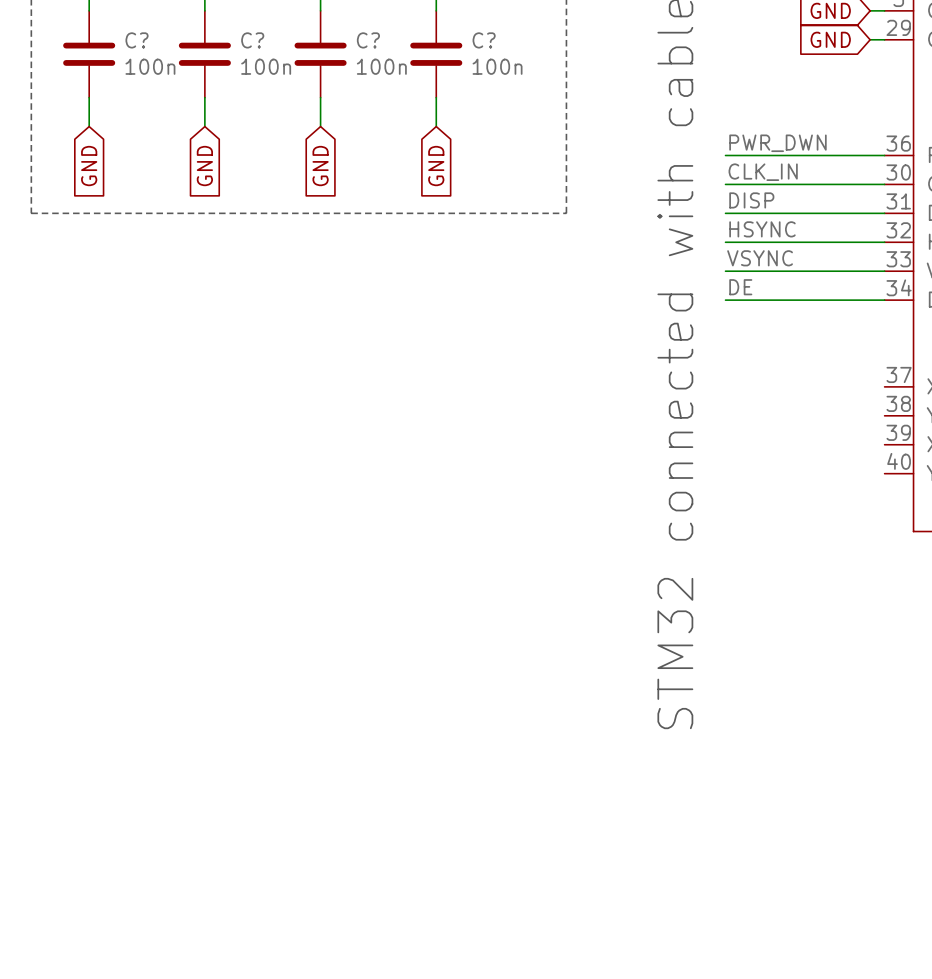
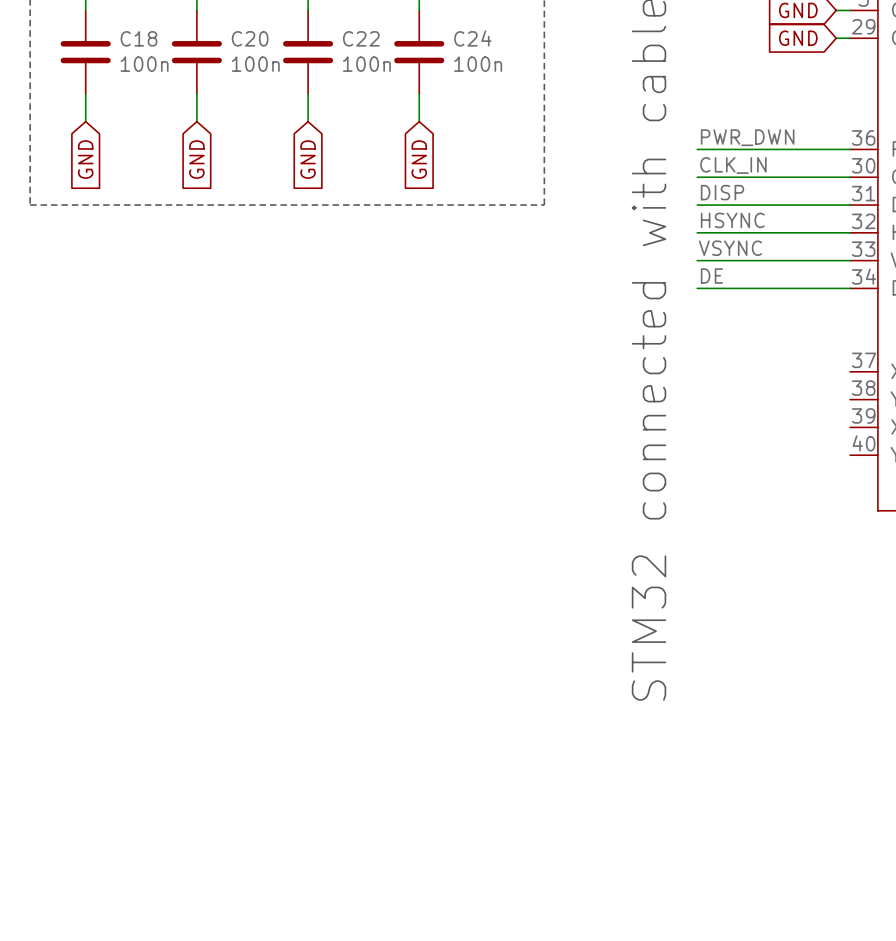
C? name: C? (137, 40) -> C18 (138, 38)
C? name: C? (252, 40) -> C20 (250, 38)
C? name: C? (368, 40) -> C22 (361, 38)
C? name: C? (484, 40) -> C24 (472, 38)

